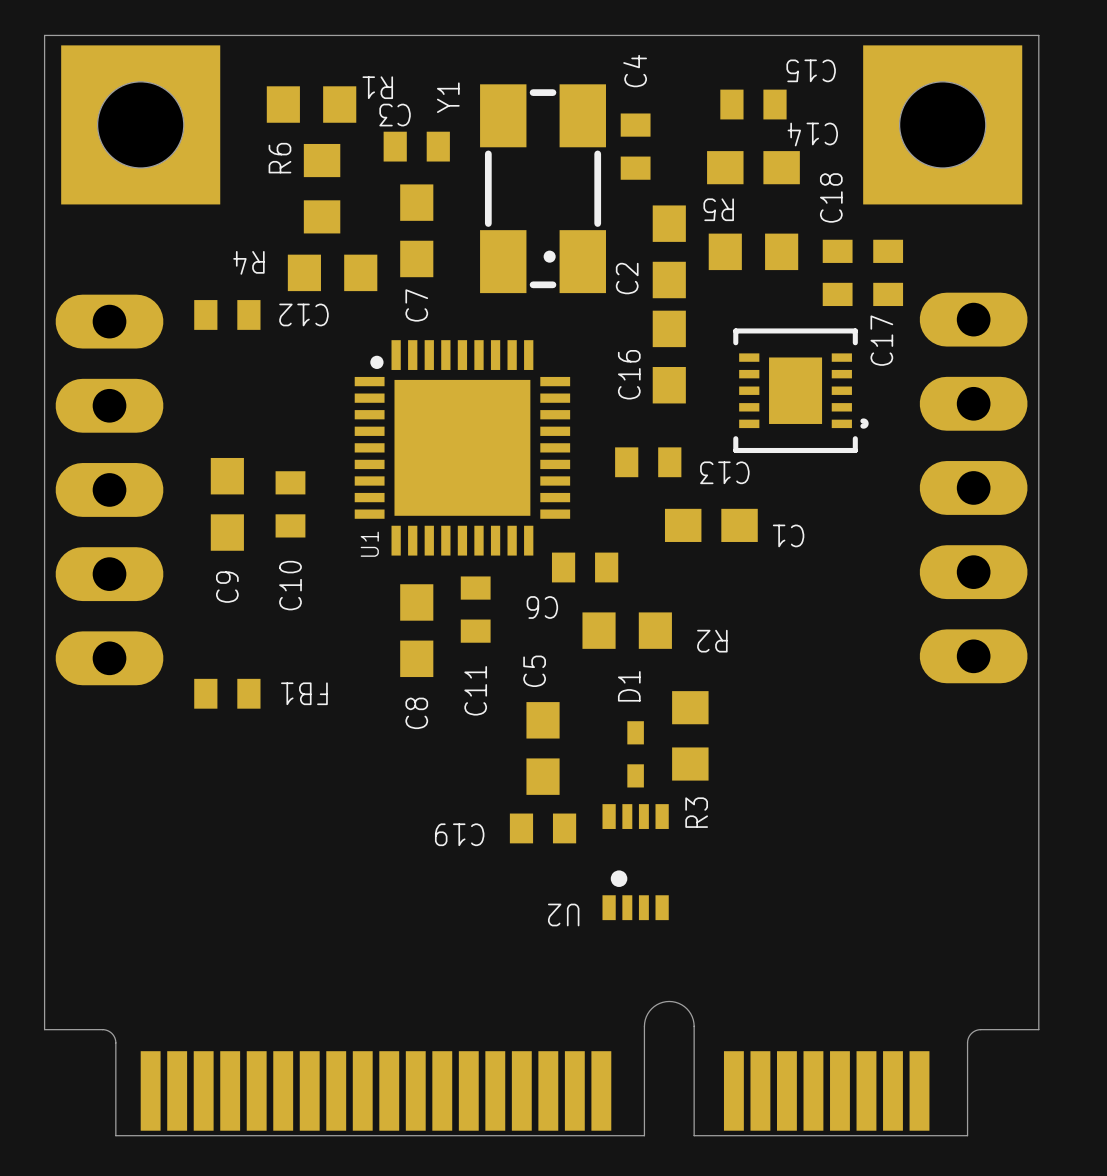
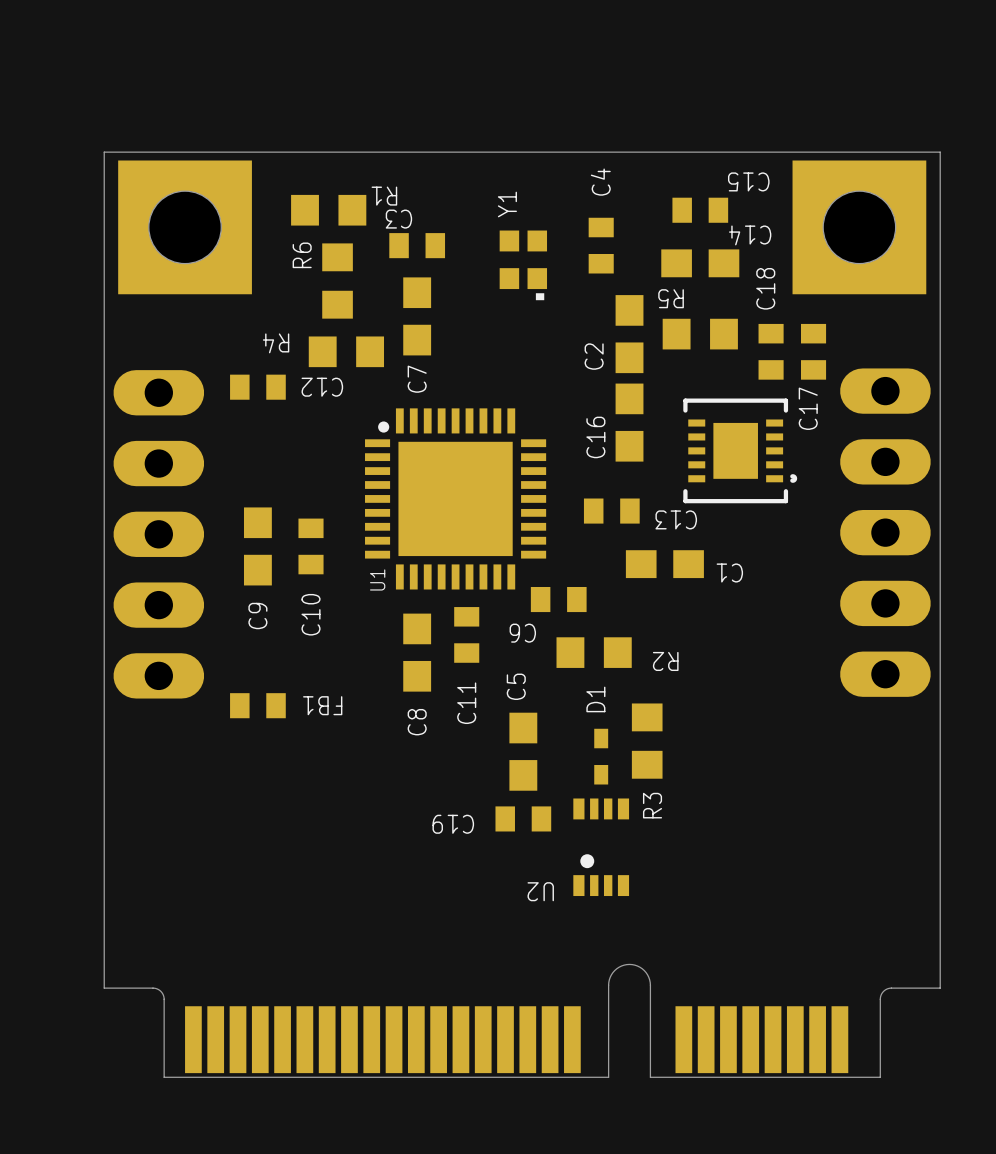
Y1 footprint: [480, 84, 606, 294] -> [499, 230, 548, 301]
Y1 name position: Y1 (448, 97) -> Y1 (507, 204)

